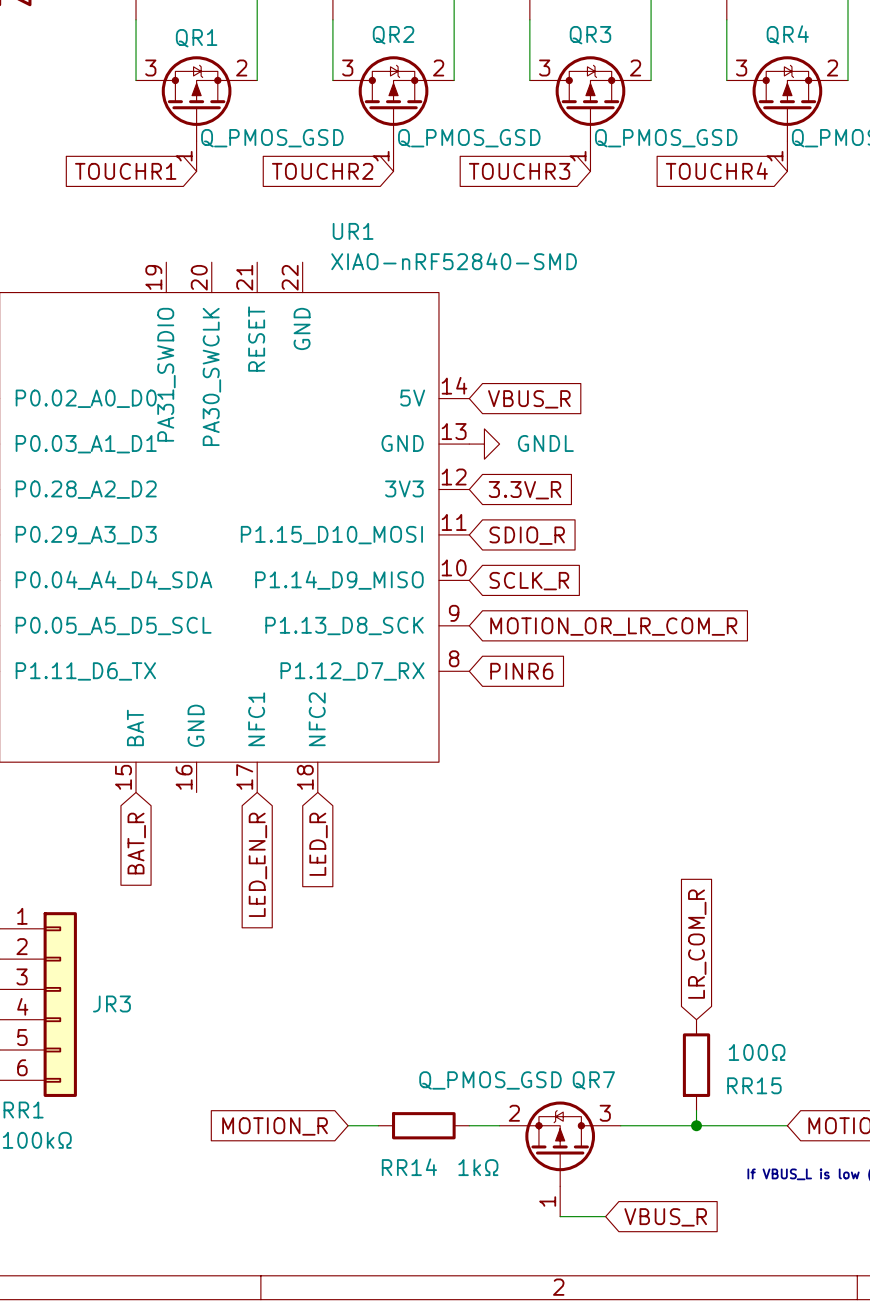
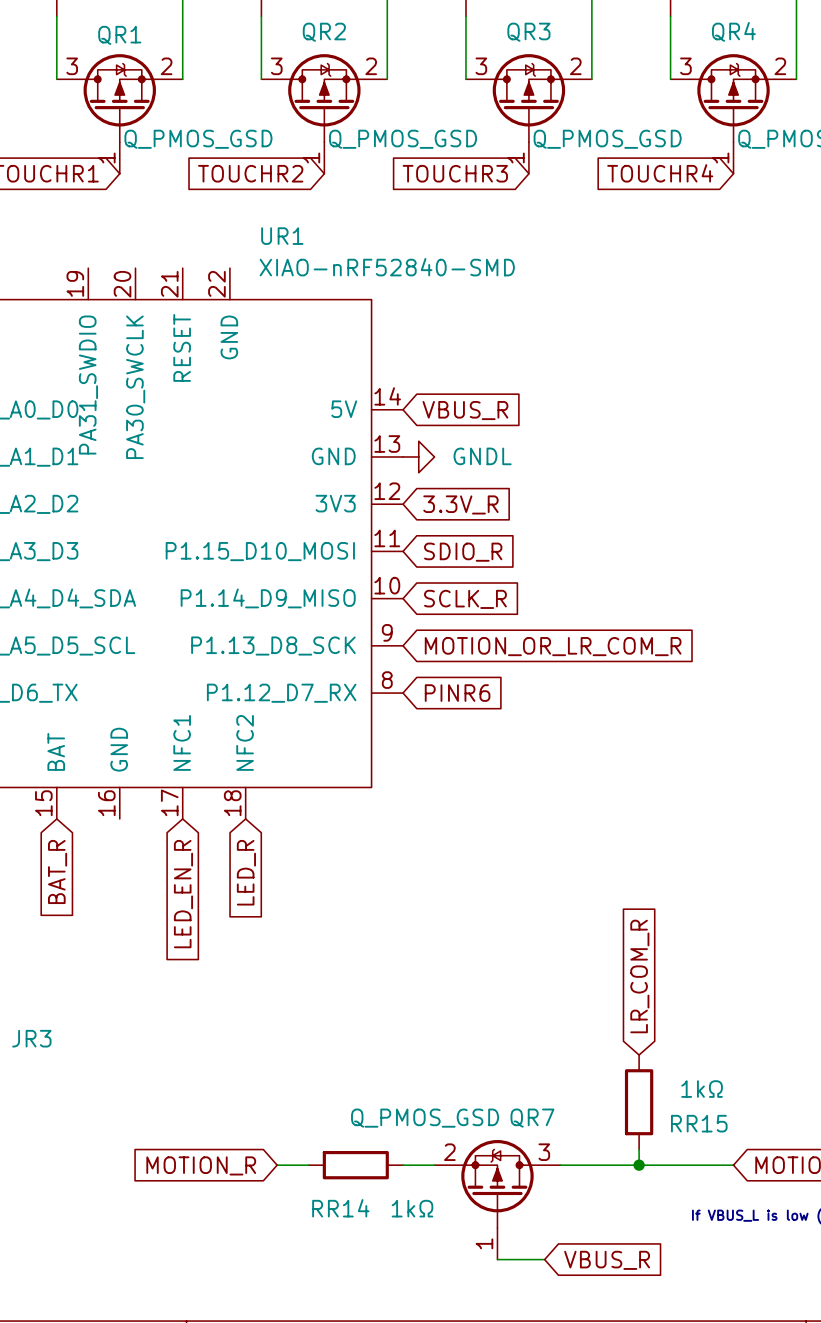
RR15 value: 100Ω (757, 1052) -> 1kΩ (702, 1089)

